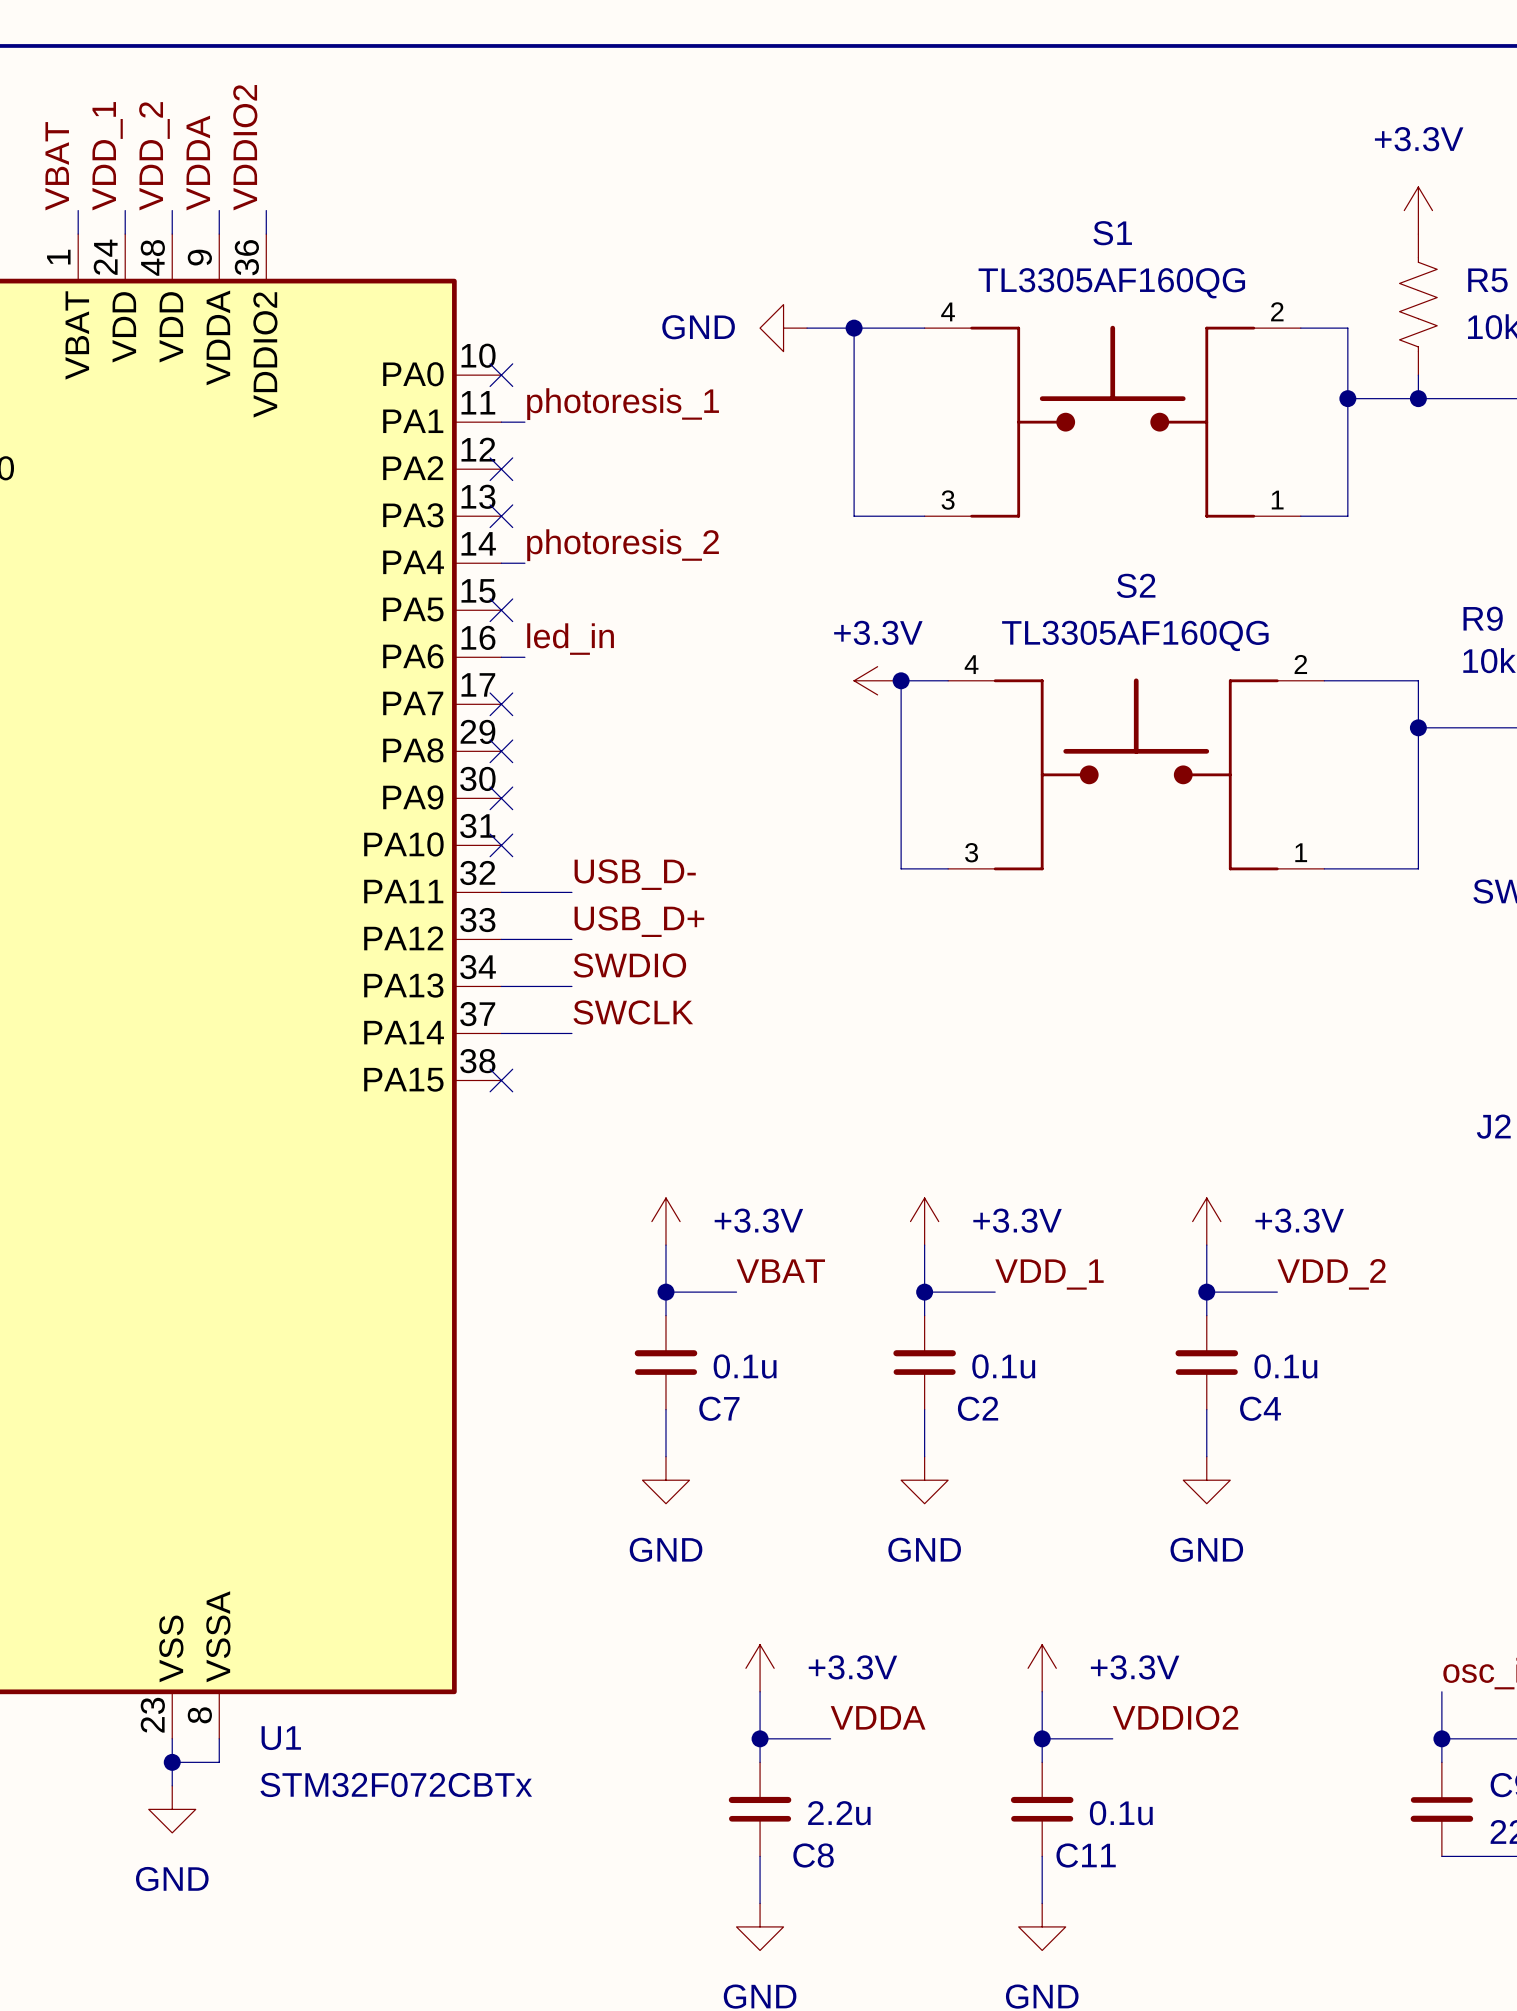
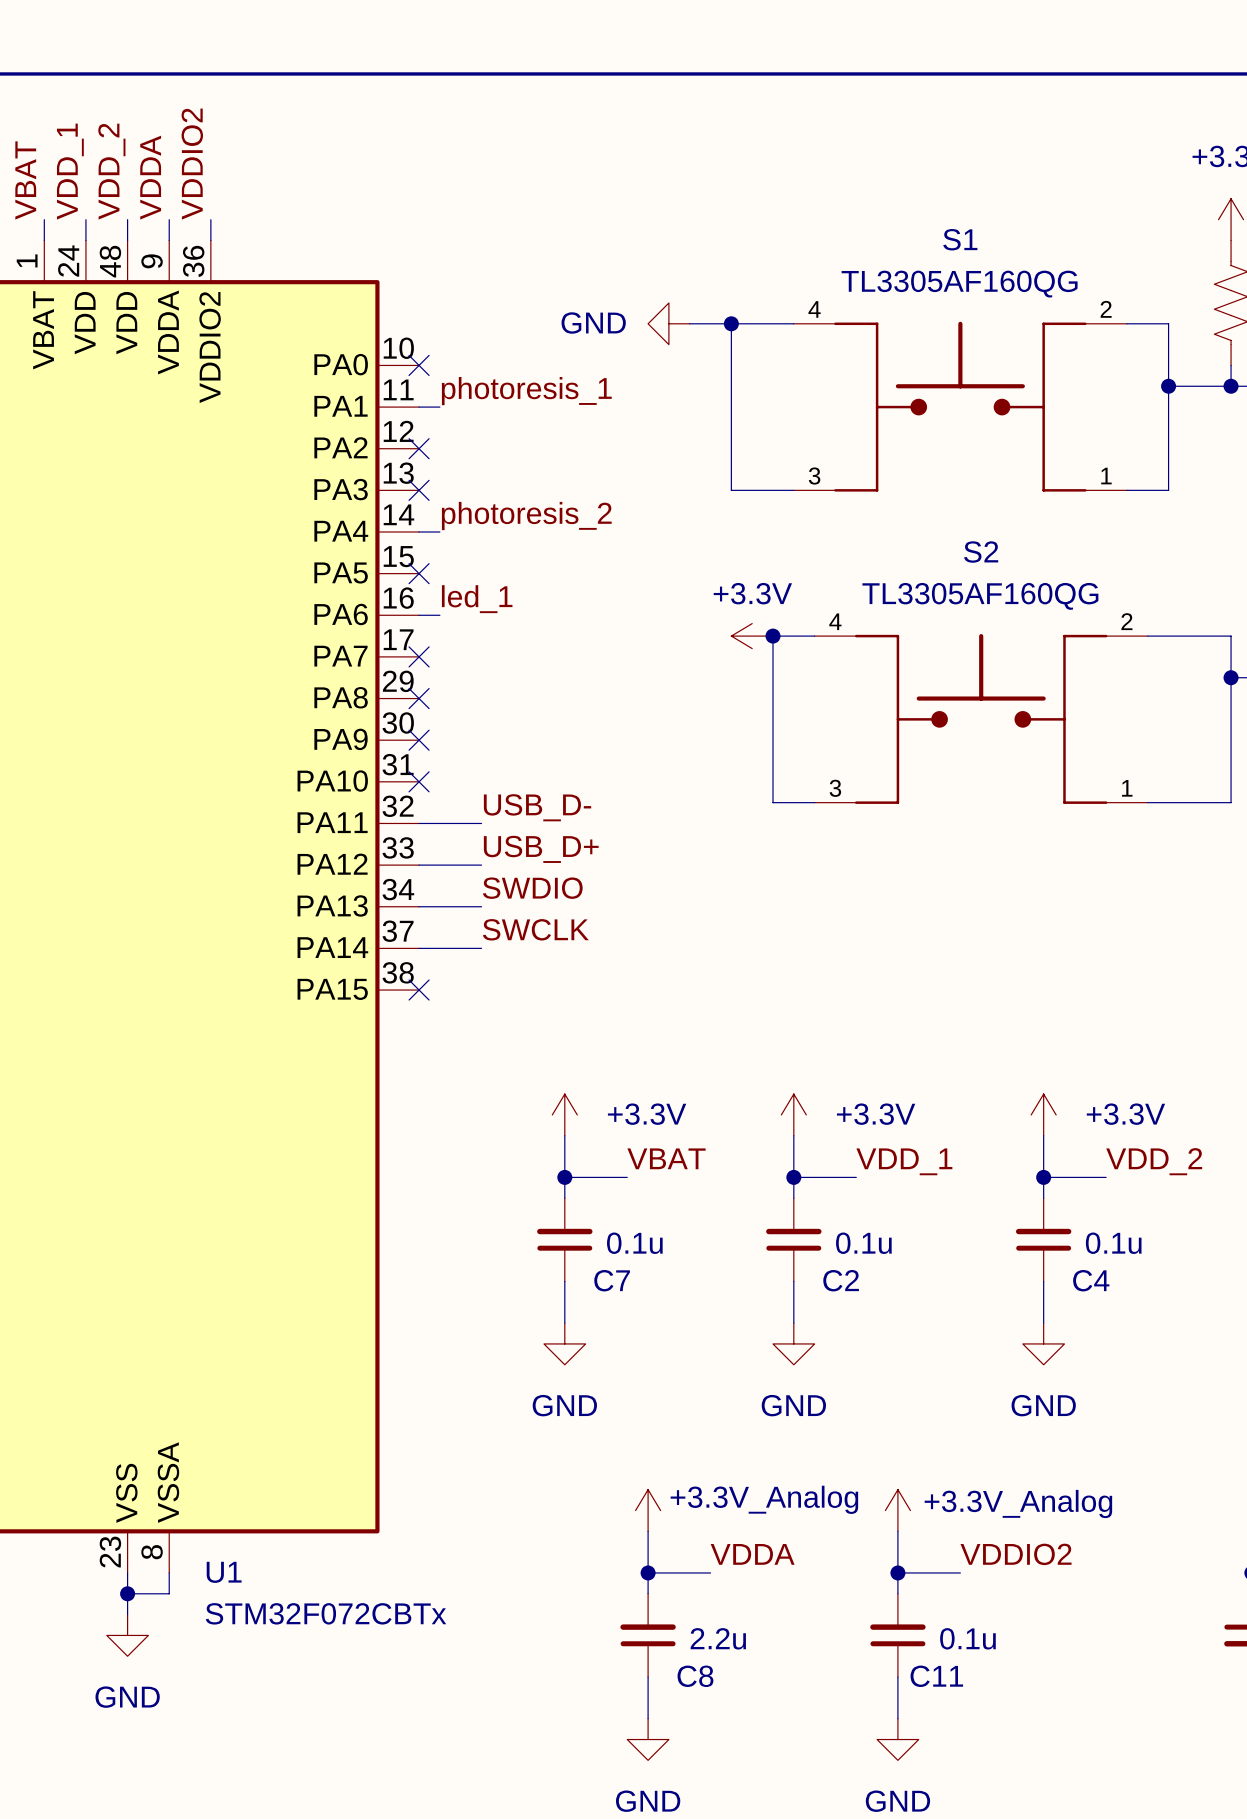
label: led_in (570, 639) -> led_1 (477, 599)
power symbol: +3.3V (760, 1668) -> +3.3V_Analog (648, 1510)
power symbol: +3.3V (1042, 1668) -> +3.3V_Analog (897, 1510)

